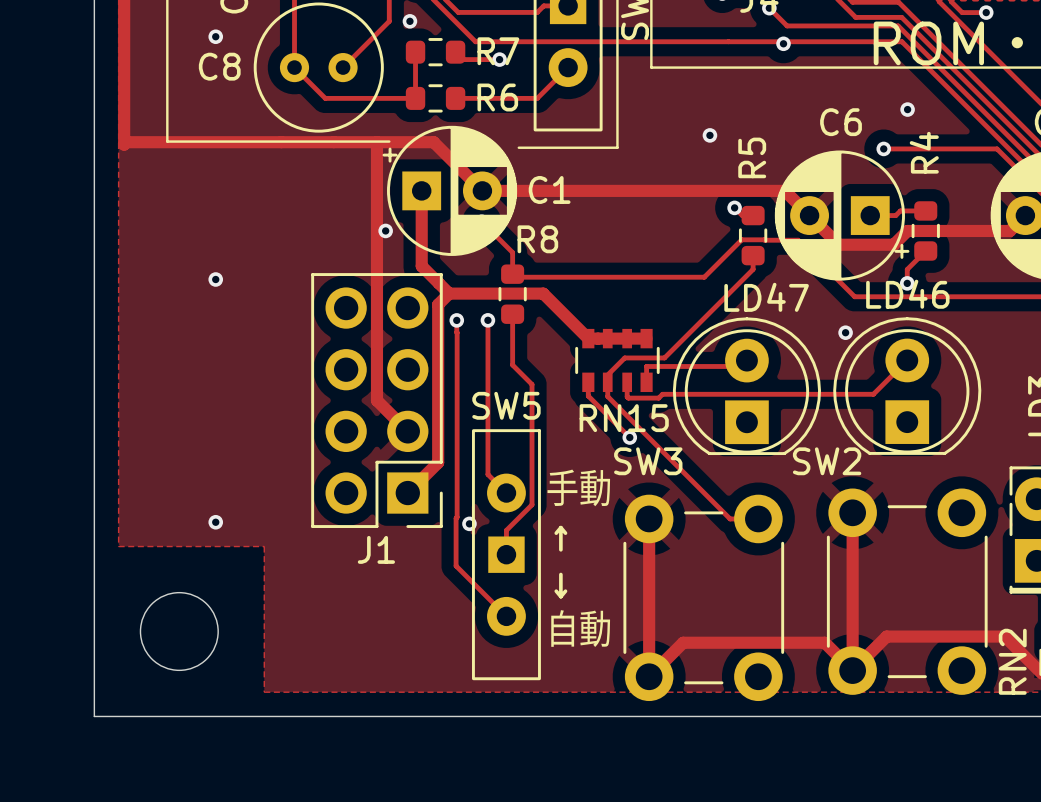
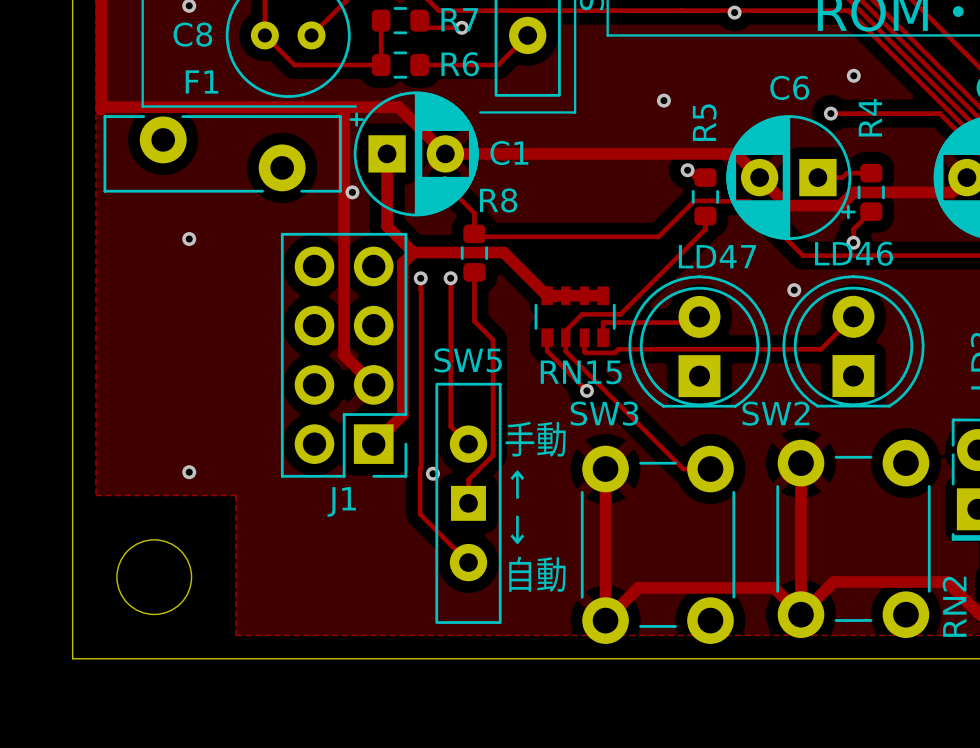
F1: none -> (222, 153)

